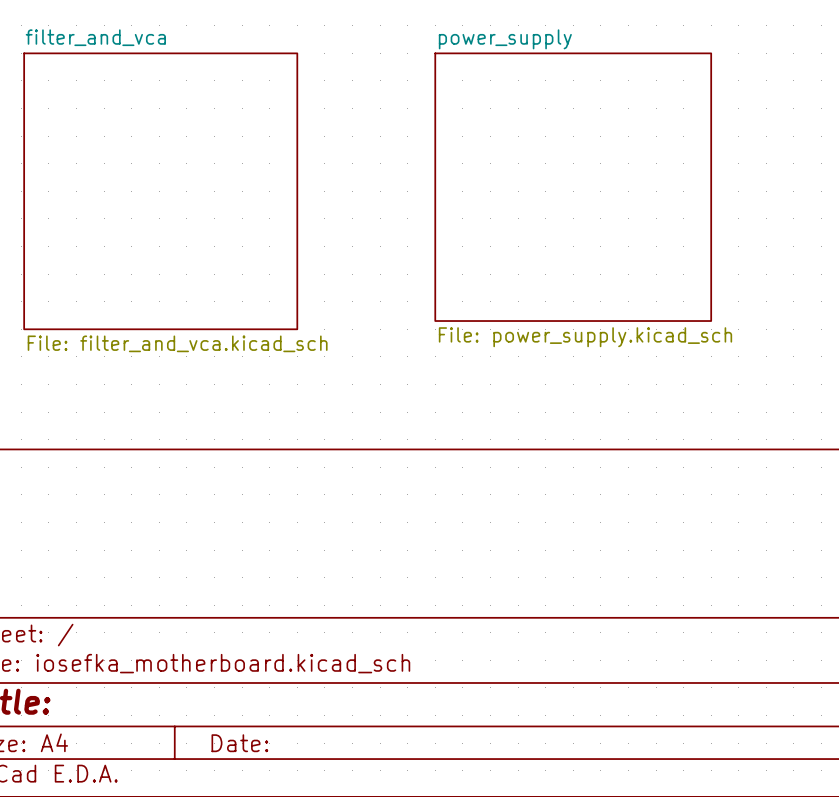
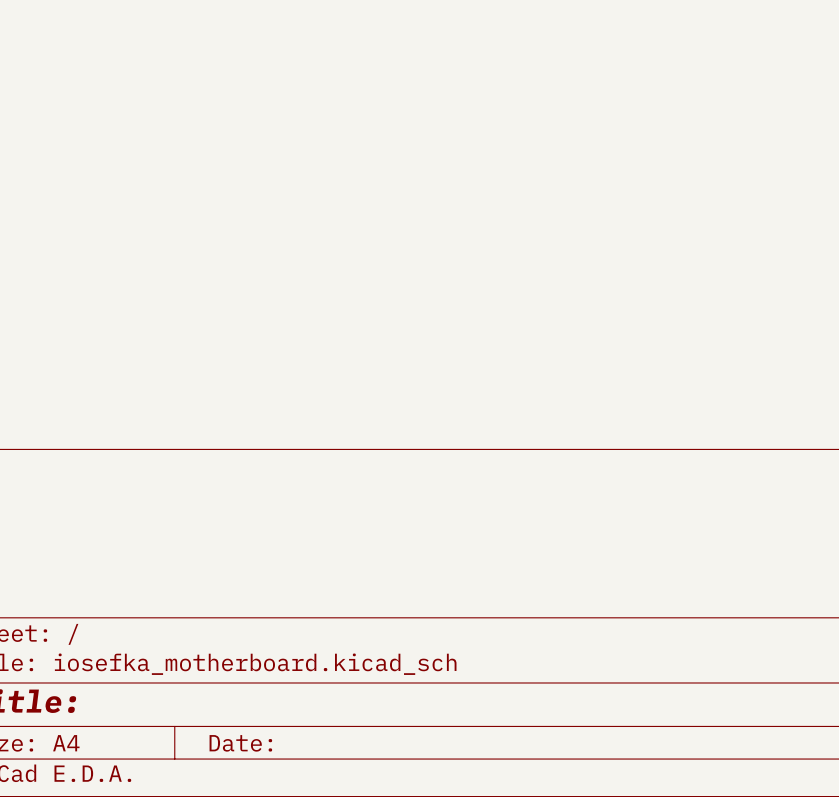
sheet power_supply: File: power_supply.kicad_sch (573, 187) -> none
sheet filter_and_vca: File: filter_and_vca.kicad_sch (160, 191) -> none

